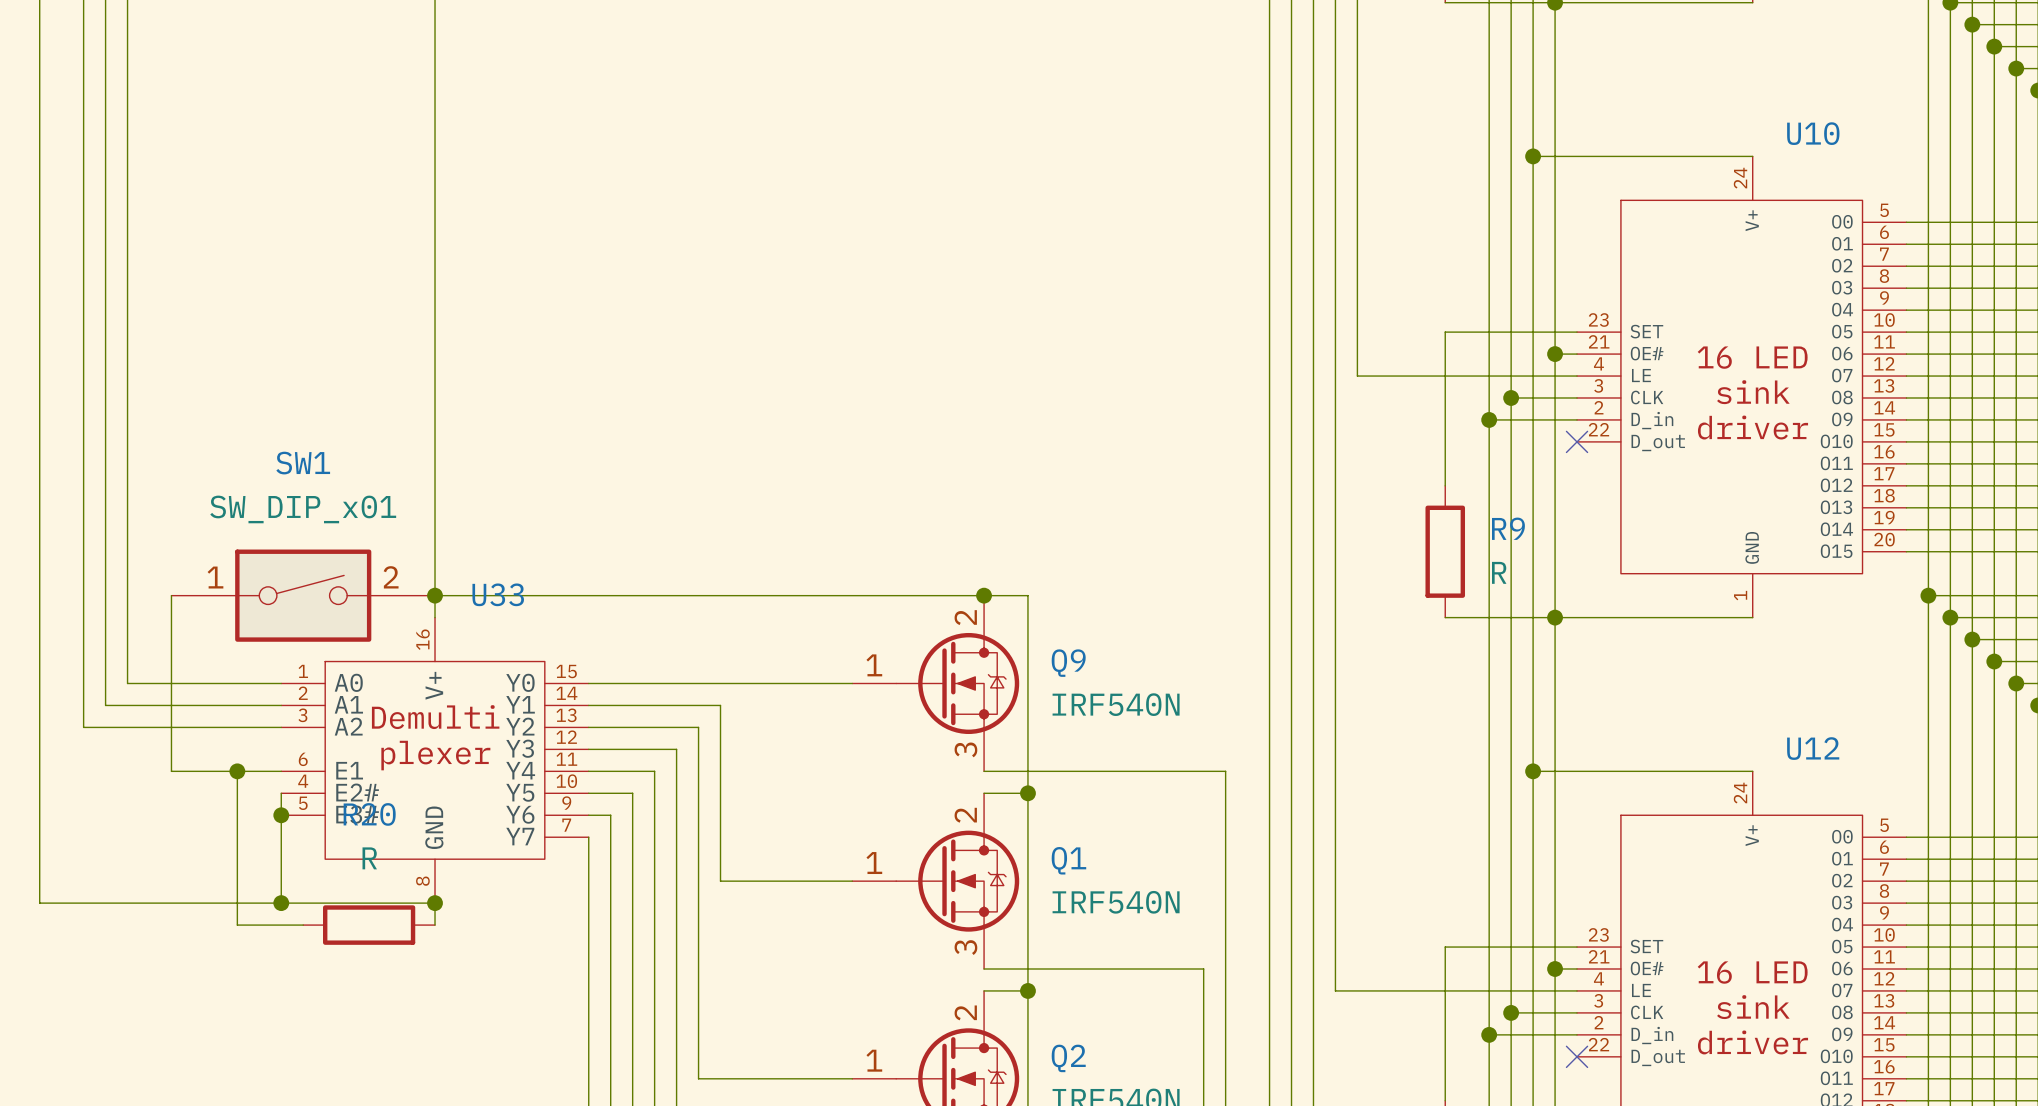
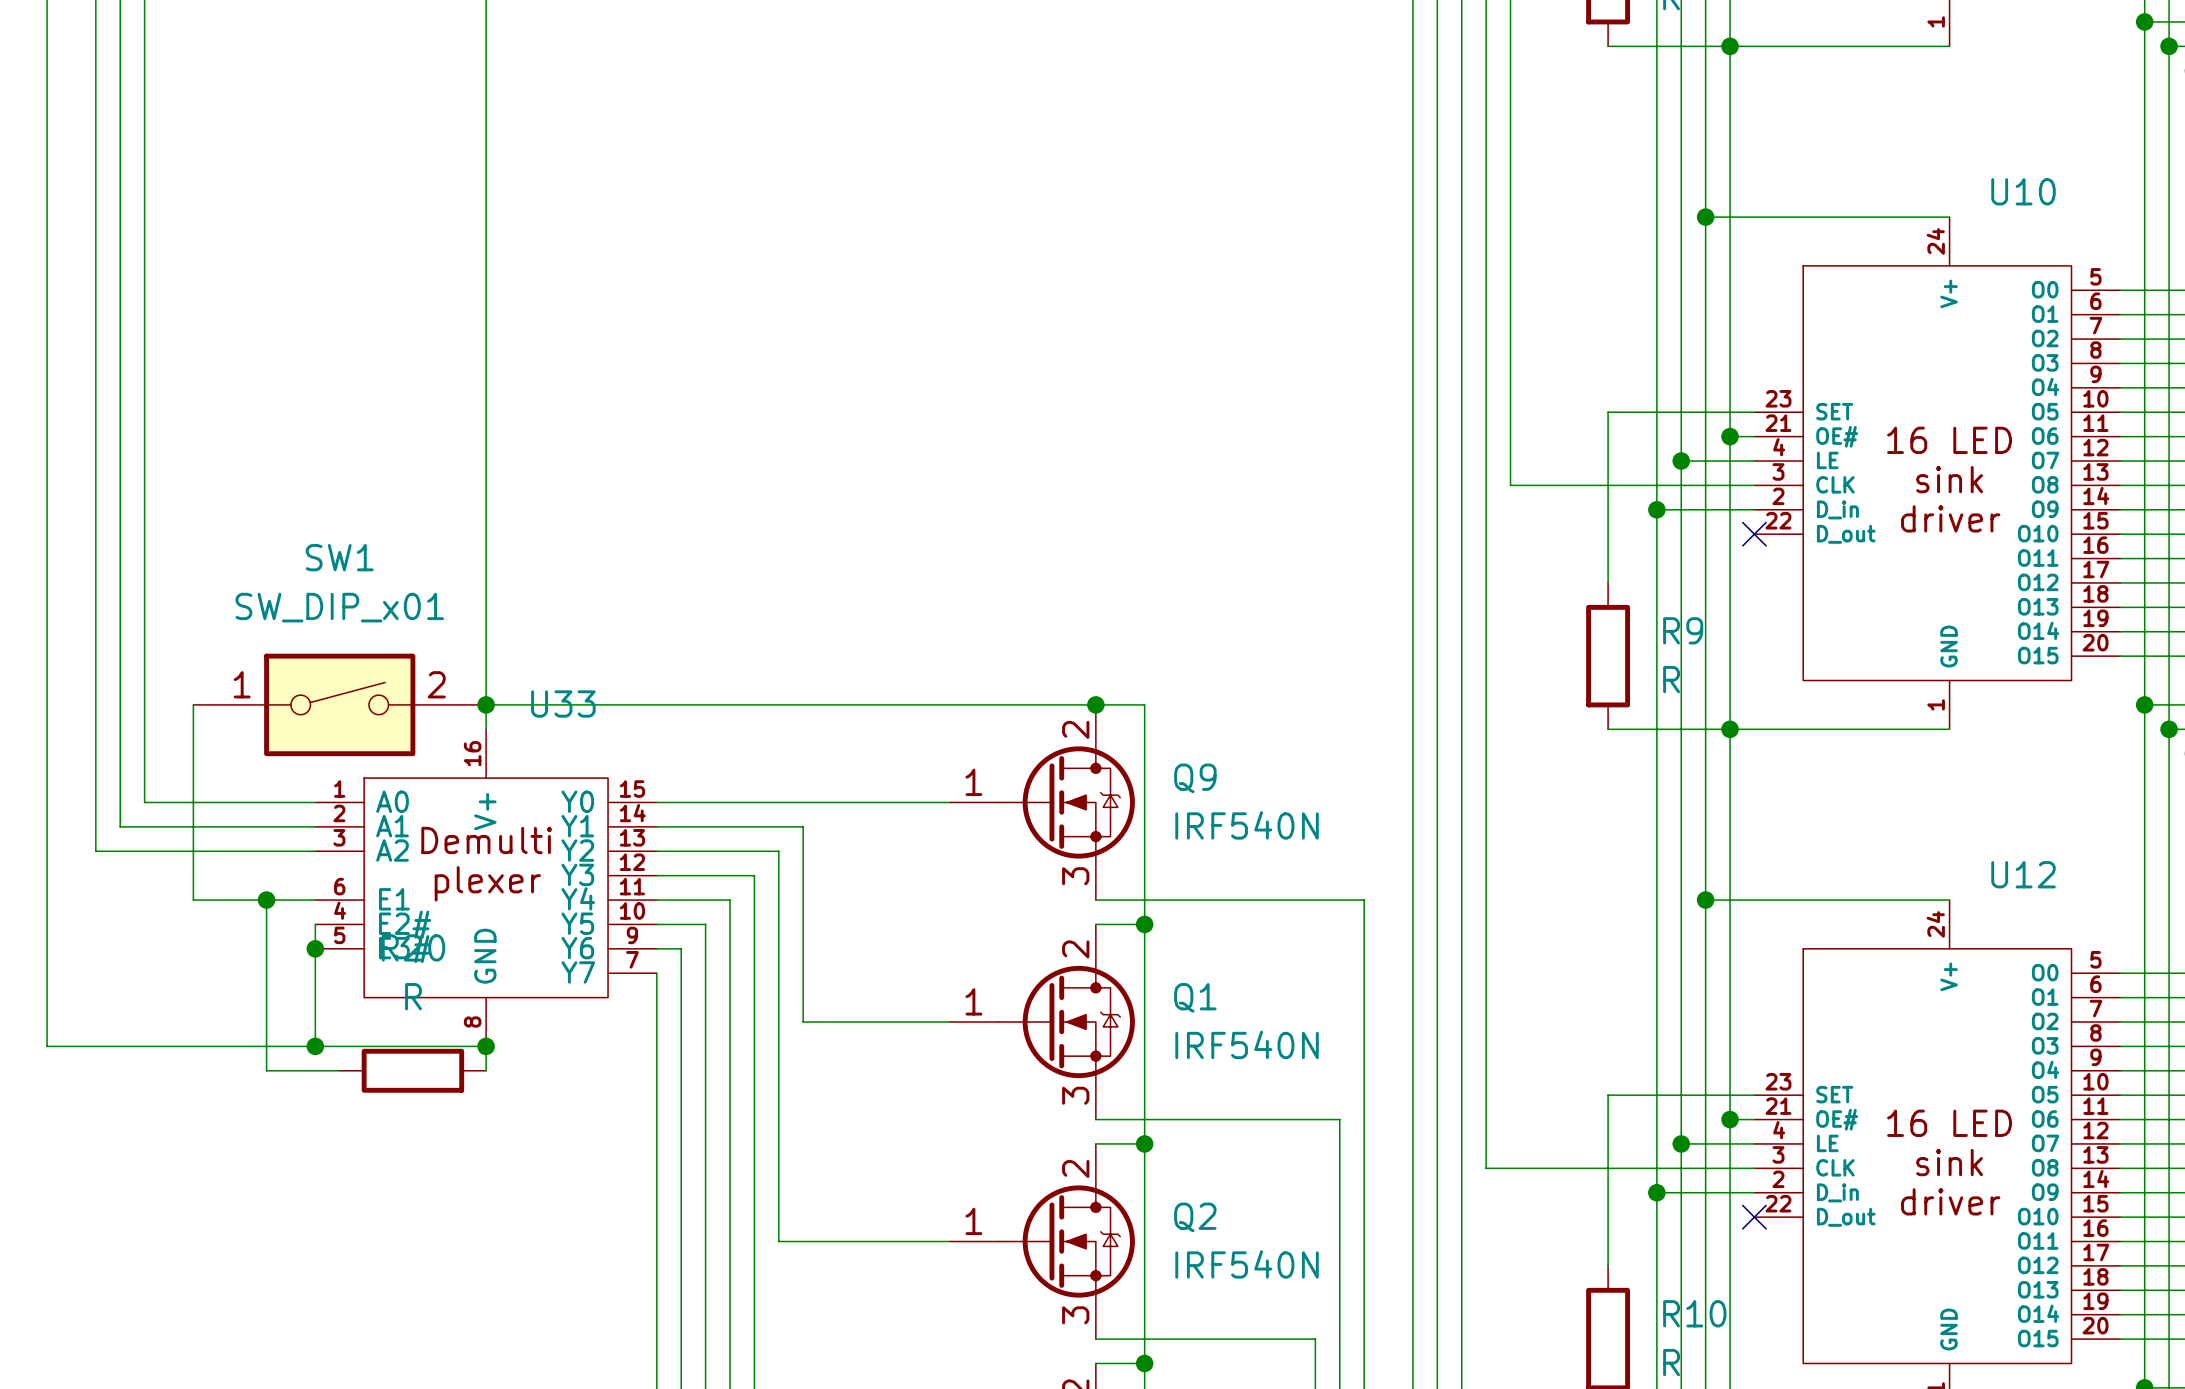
wire: (1357, 376) (1511, 376) -> (1510, 461) (1510, 485) (1681, 485)
junction position: (1511, 397) -> (1681, 461)
wire: (1335, 990) (1511, 990) -> (1486, 1143) (1486, 1168) (1681, 1168)
junction position: (1511, 1012) -> (1681, 1143)

